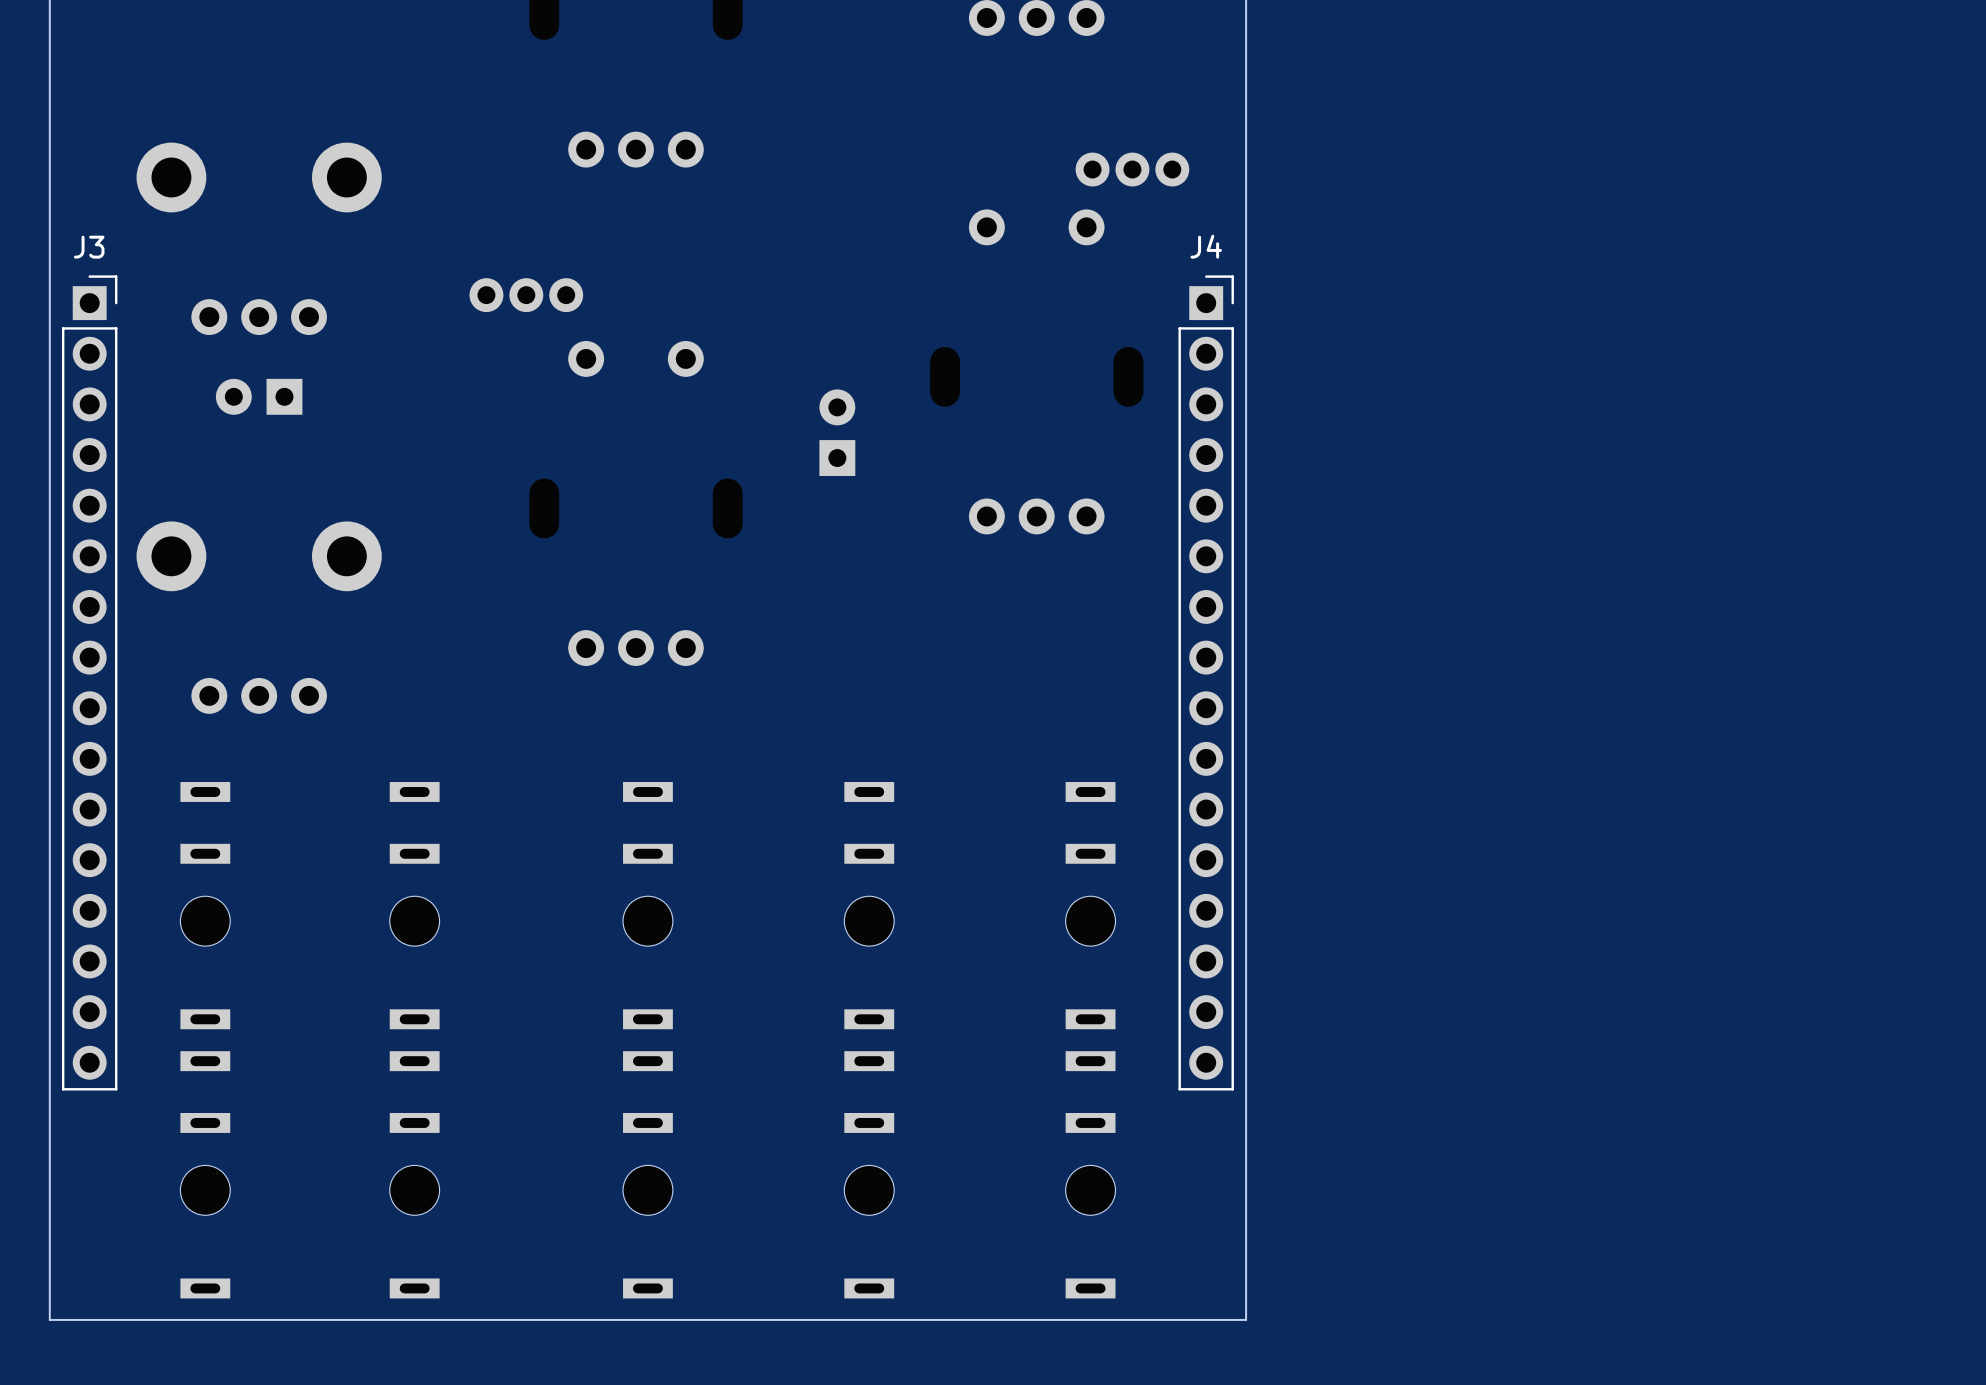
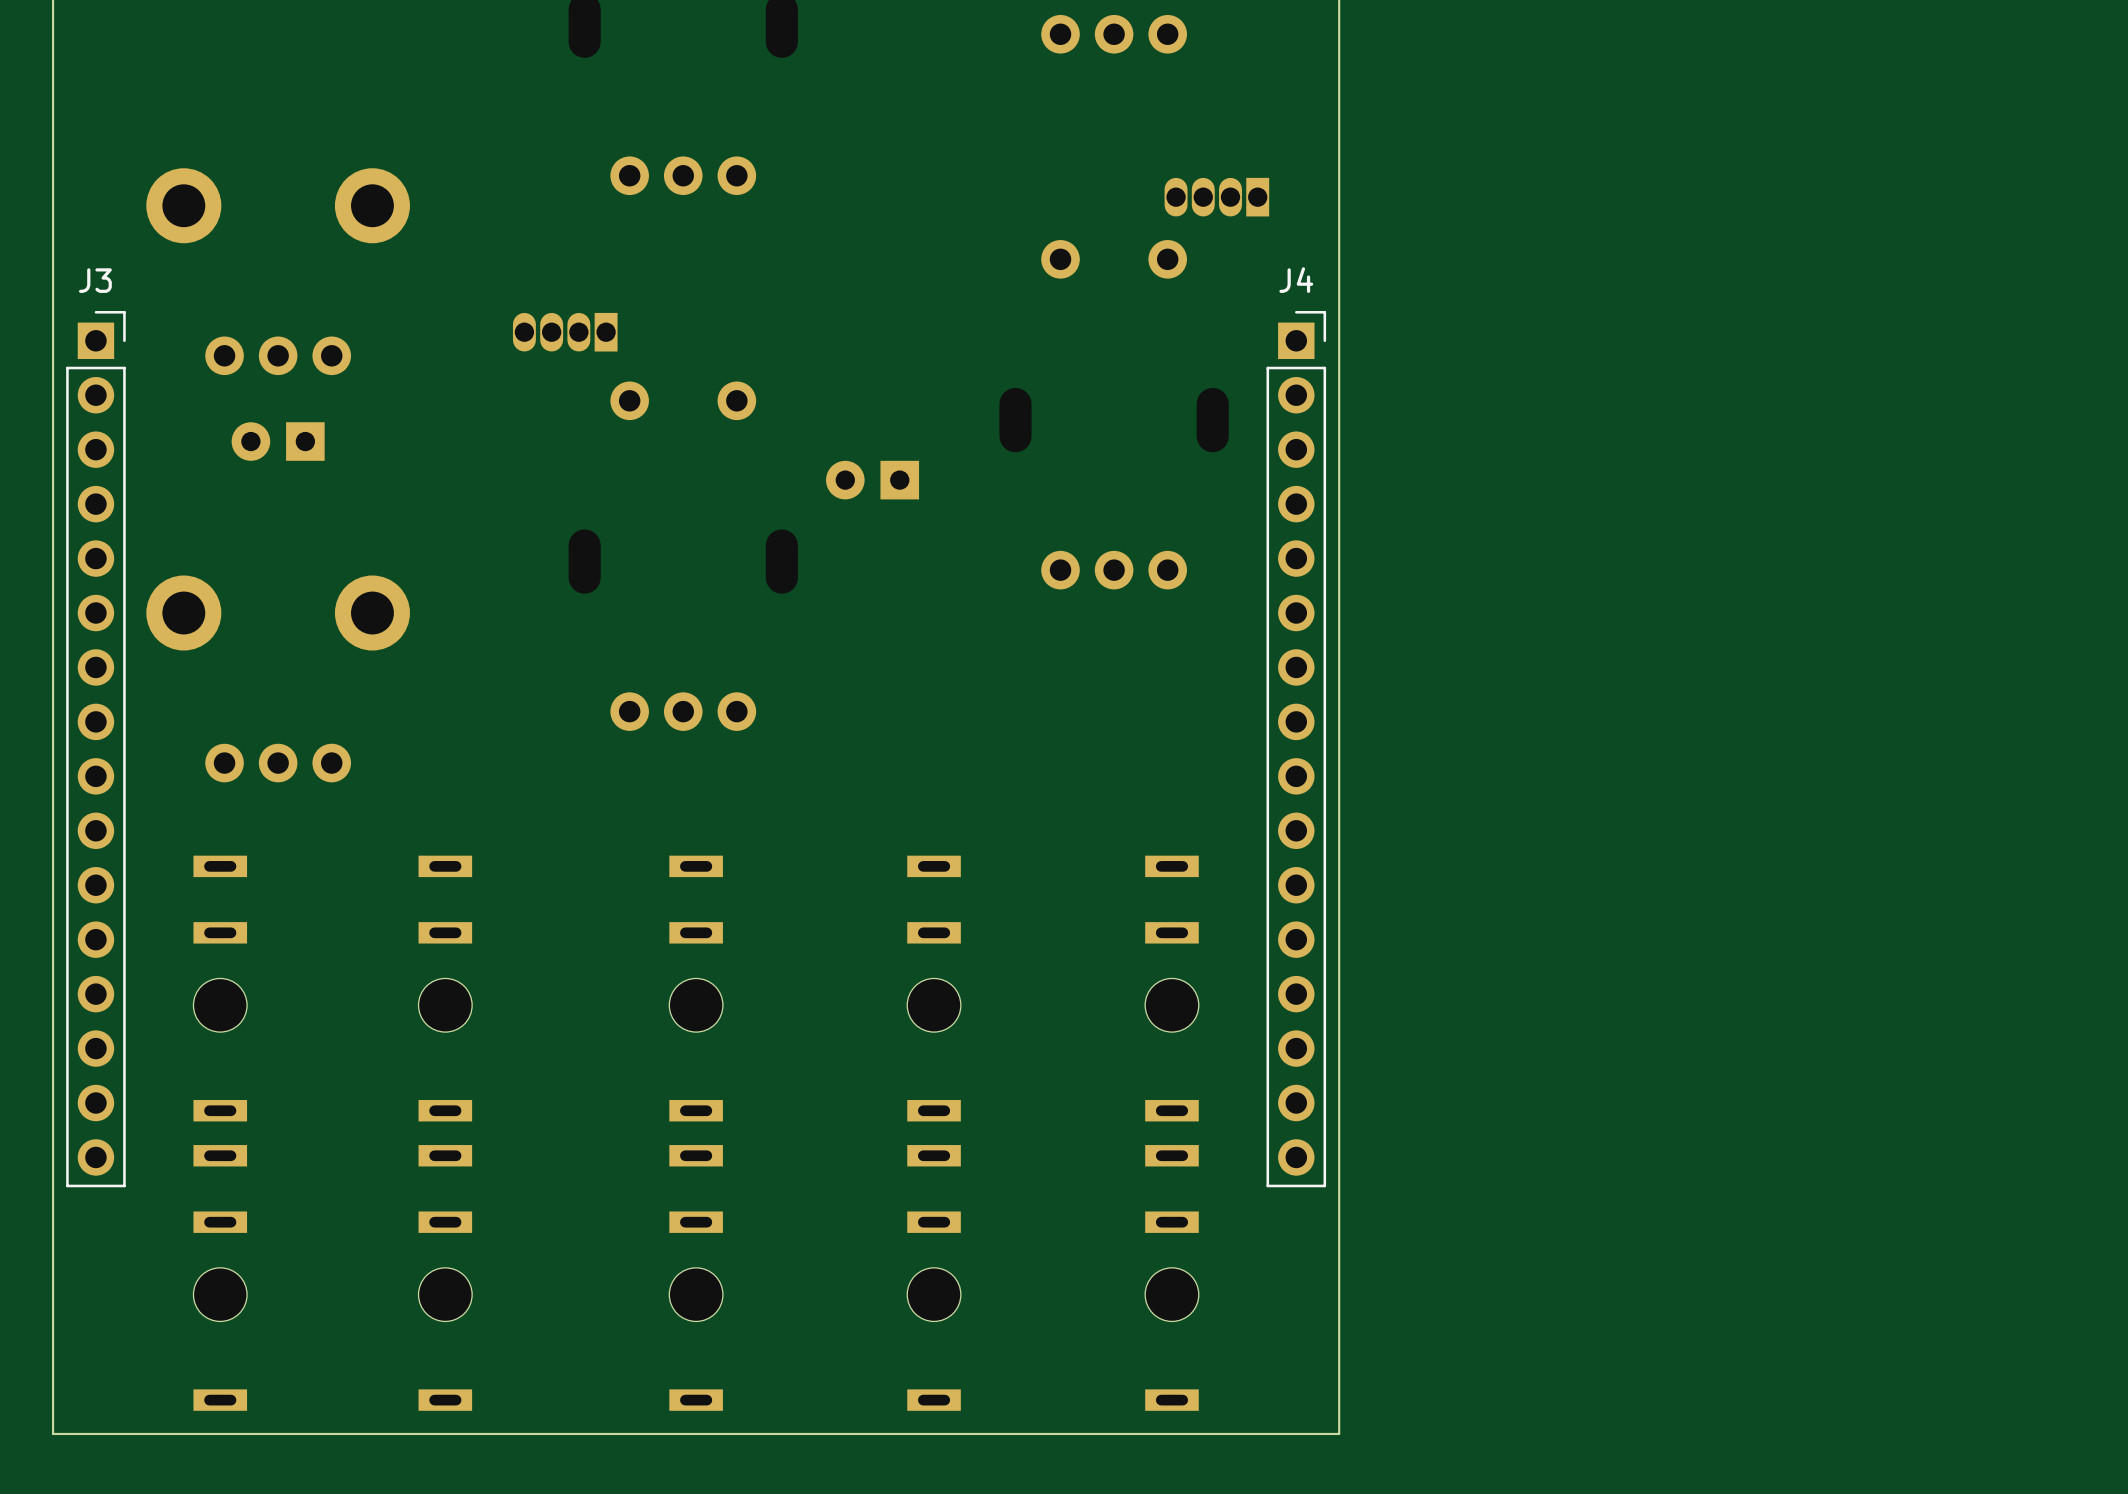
part footprint: [1075, 152, 1190, 187] -> [1164, 177, 1270, 217]
part footprint: [469, 278, 584, 313] -> [512, 312, 618, 352]
part rotation: 0° (837, 432) -> 90° counterclockwise (872, 480)

